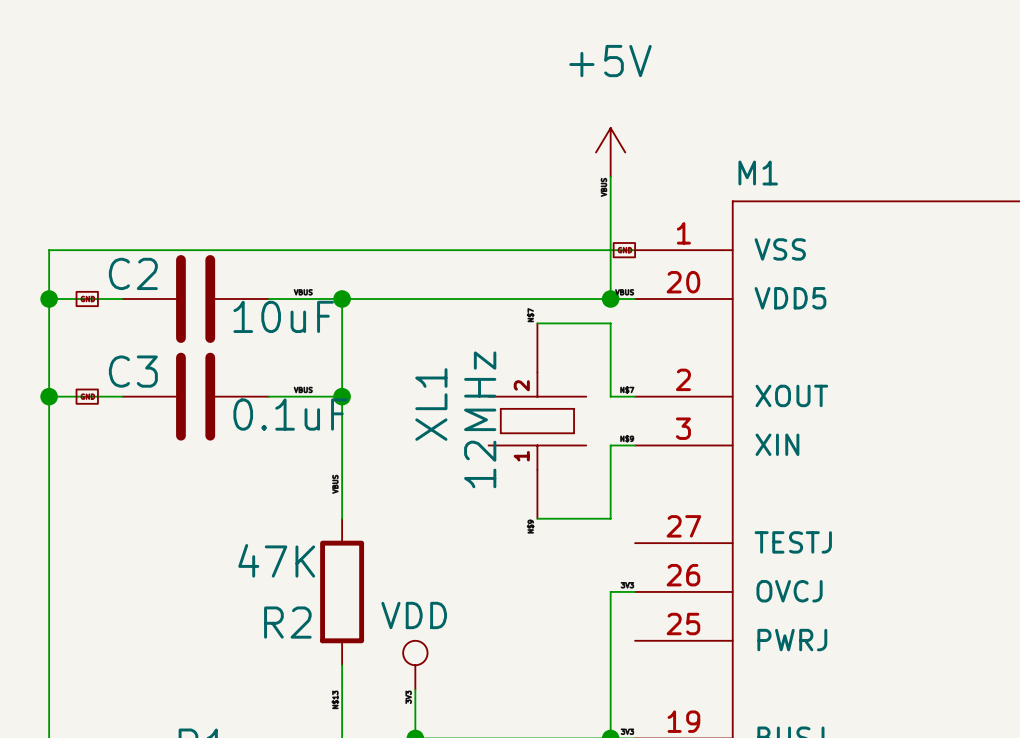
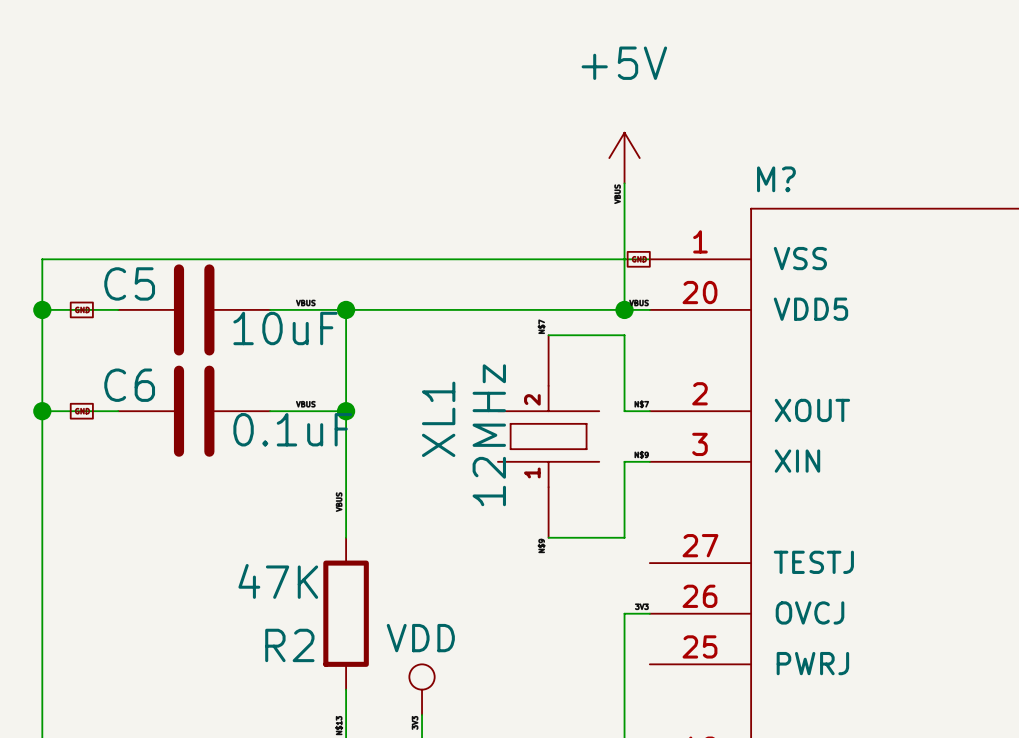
M1 name: M1 (758, 173) -> M? (776, 179)
C2 name: C2 (133, 273) -> C5 (129, 283)
C3 name: C3 (133, 371) -> C6 (129, 385)

